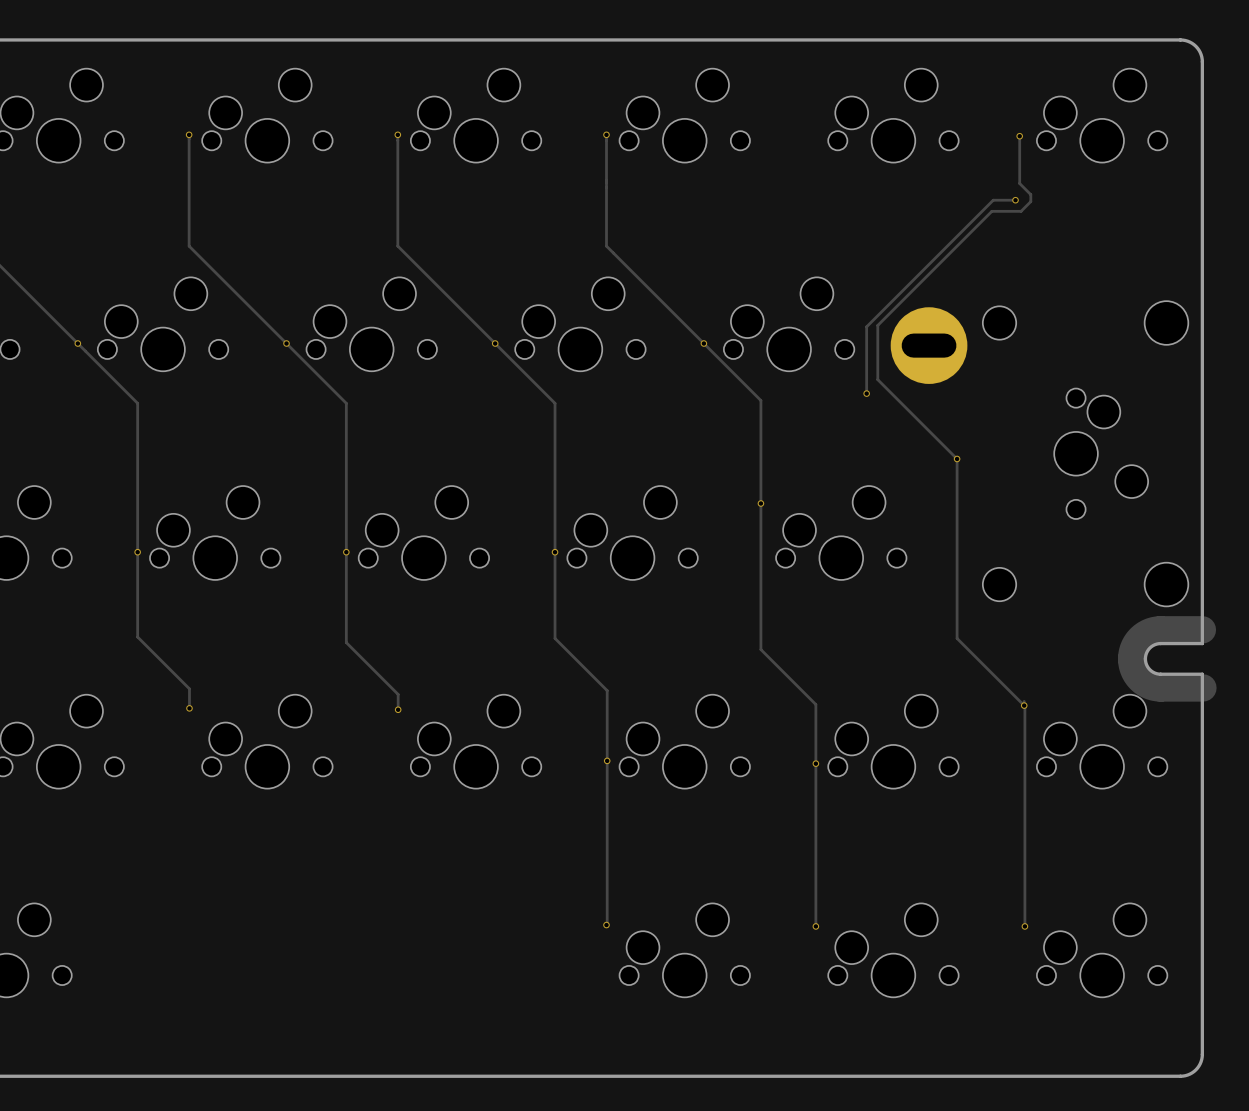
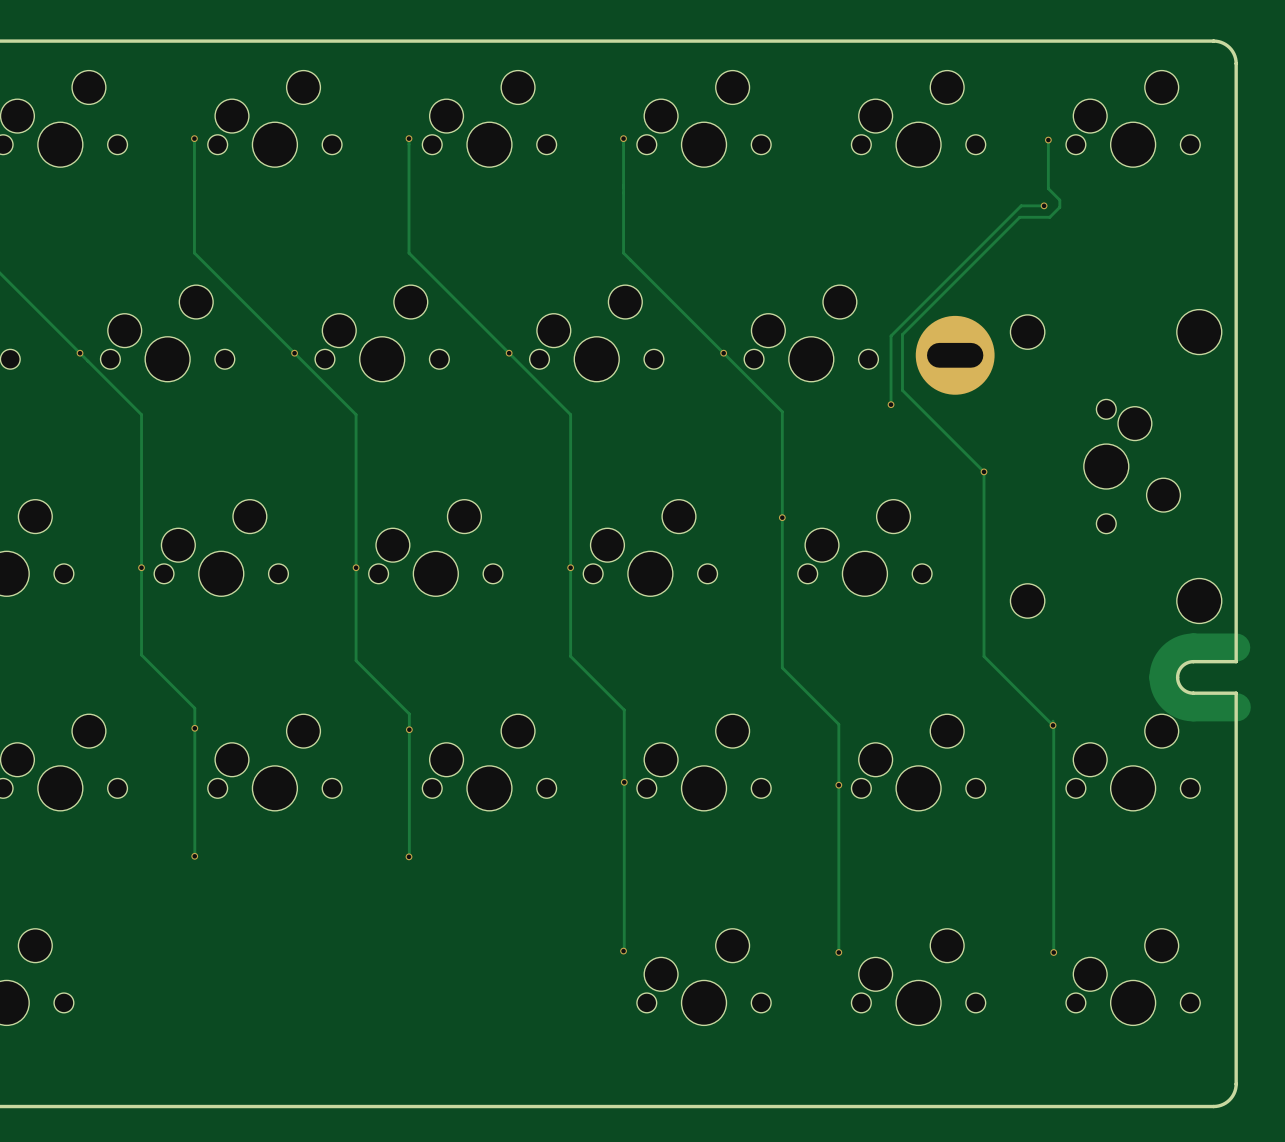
track: none -> (194, 728) (194, 856)
track: none -> (409, 729) (409, 856)
via: none -> (194, 856)
via: none -> (409, 856)

